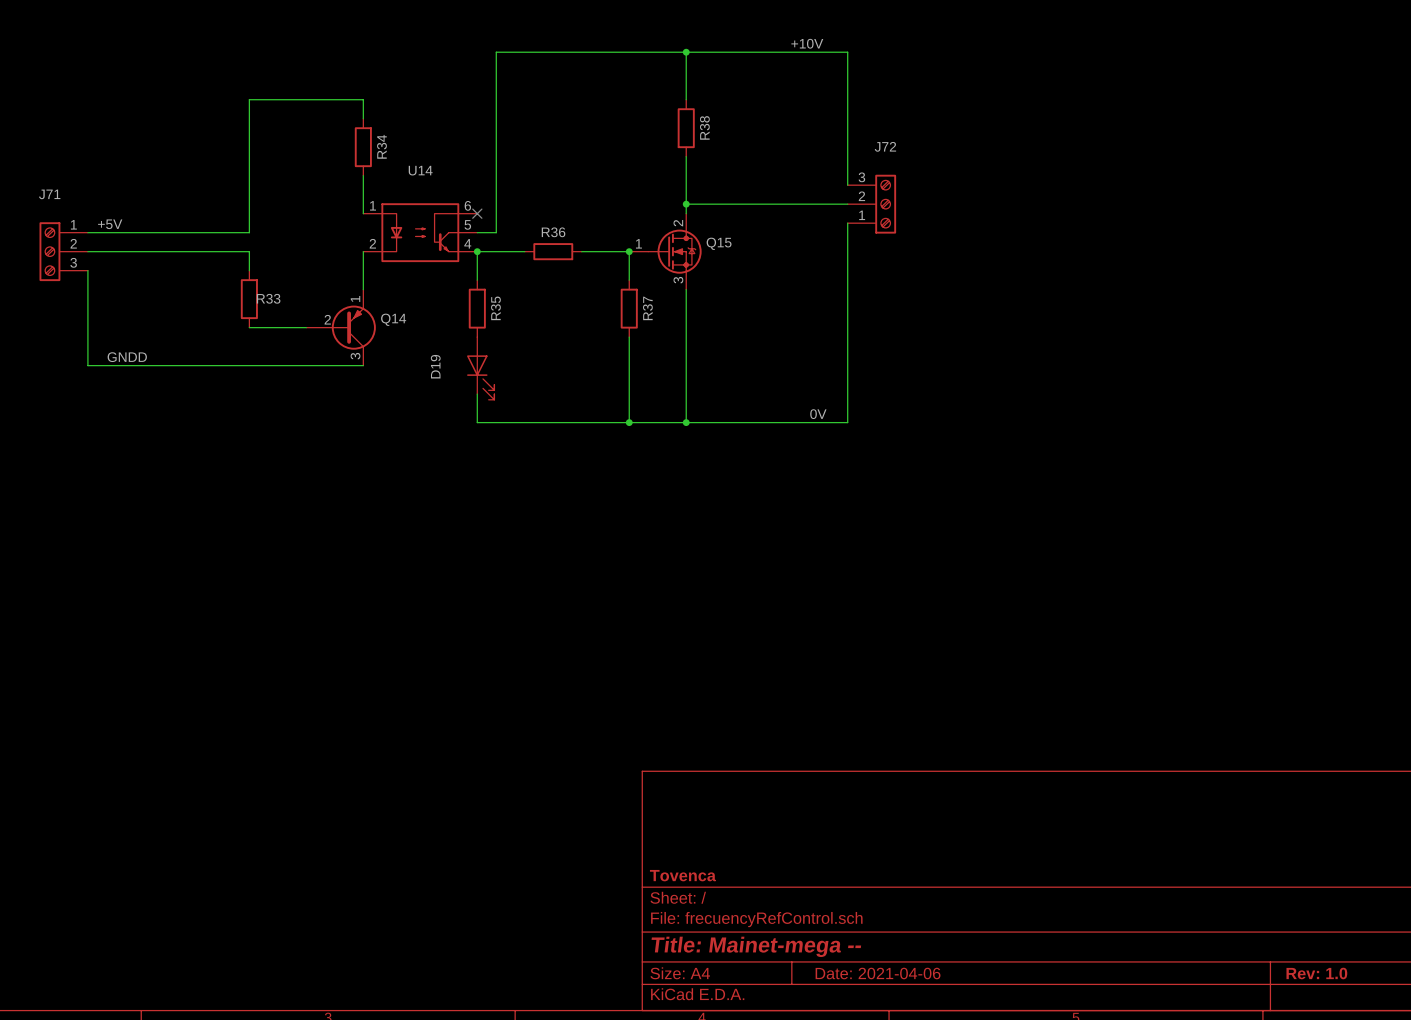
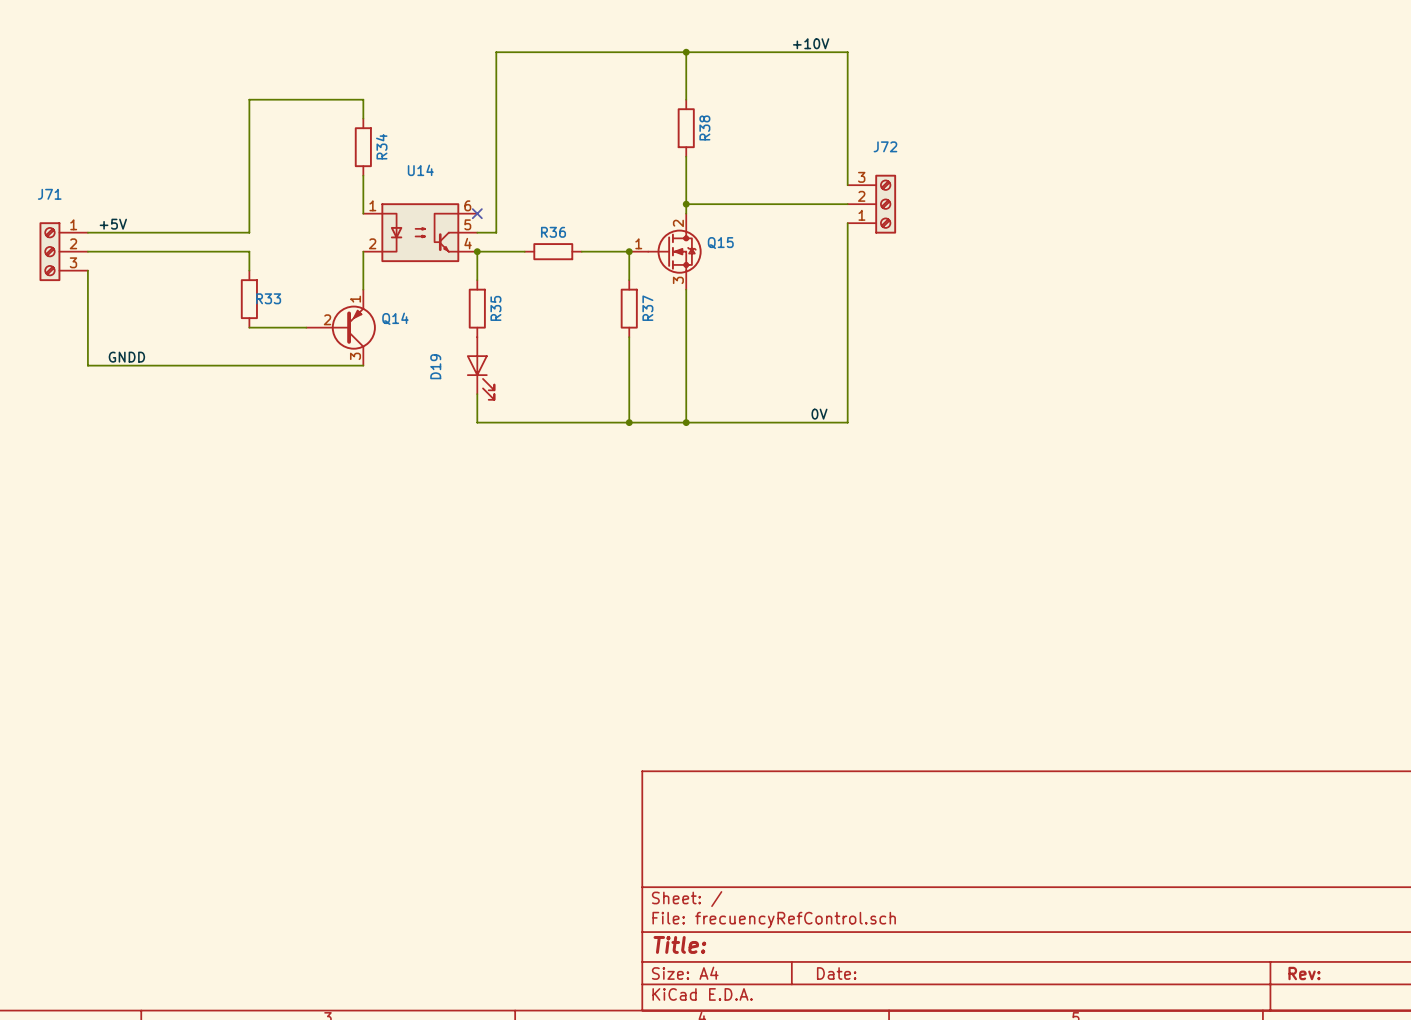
title block: Tovenca (682, 875) -> none
title block: Title: Mainet-mega -- (756, 946) -> Title: (679, 944)
title block: Date: 2021-04-06 (878, 973) -> Date: (836, 973)
title block: Rev: 1.0 (1316, 973) -> Rev: (1304, 973)

